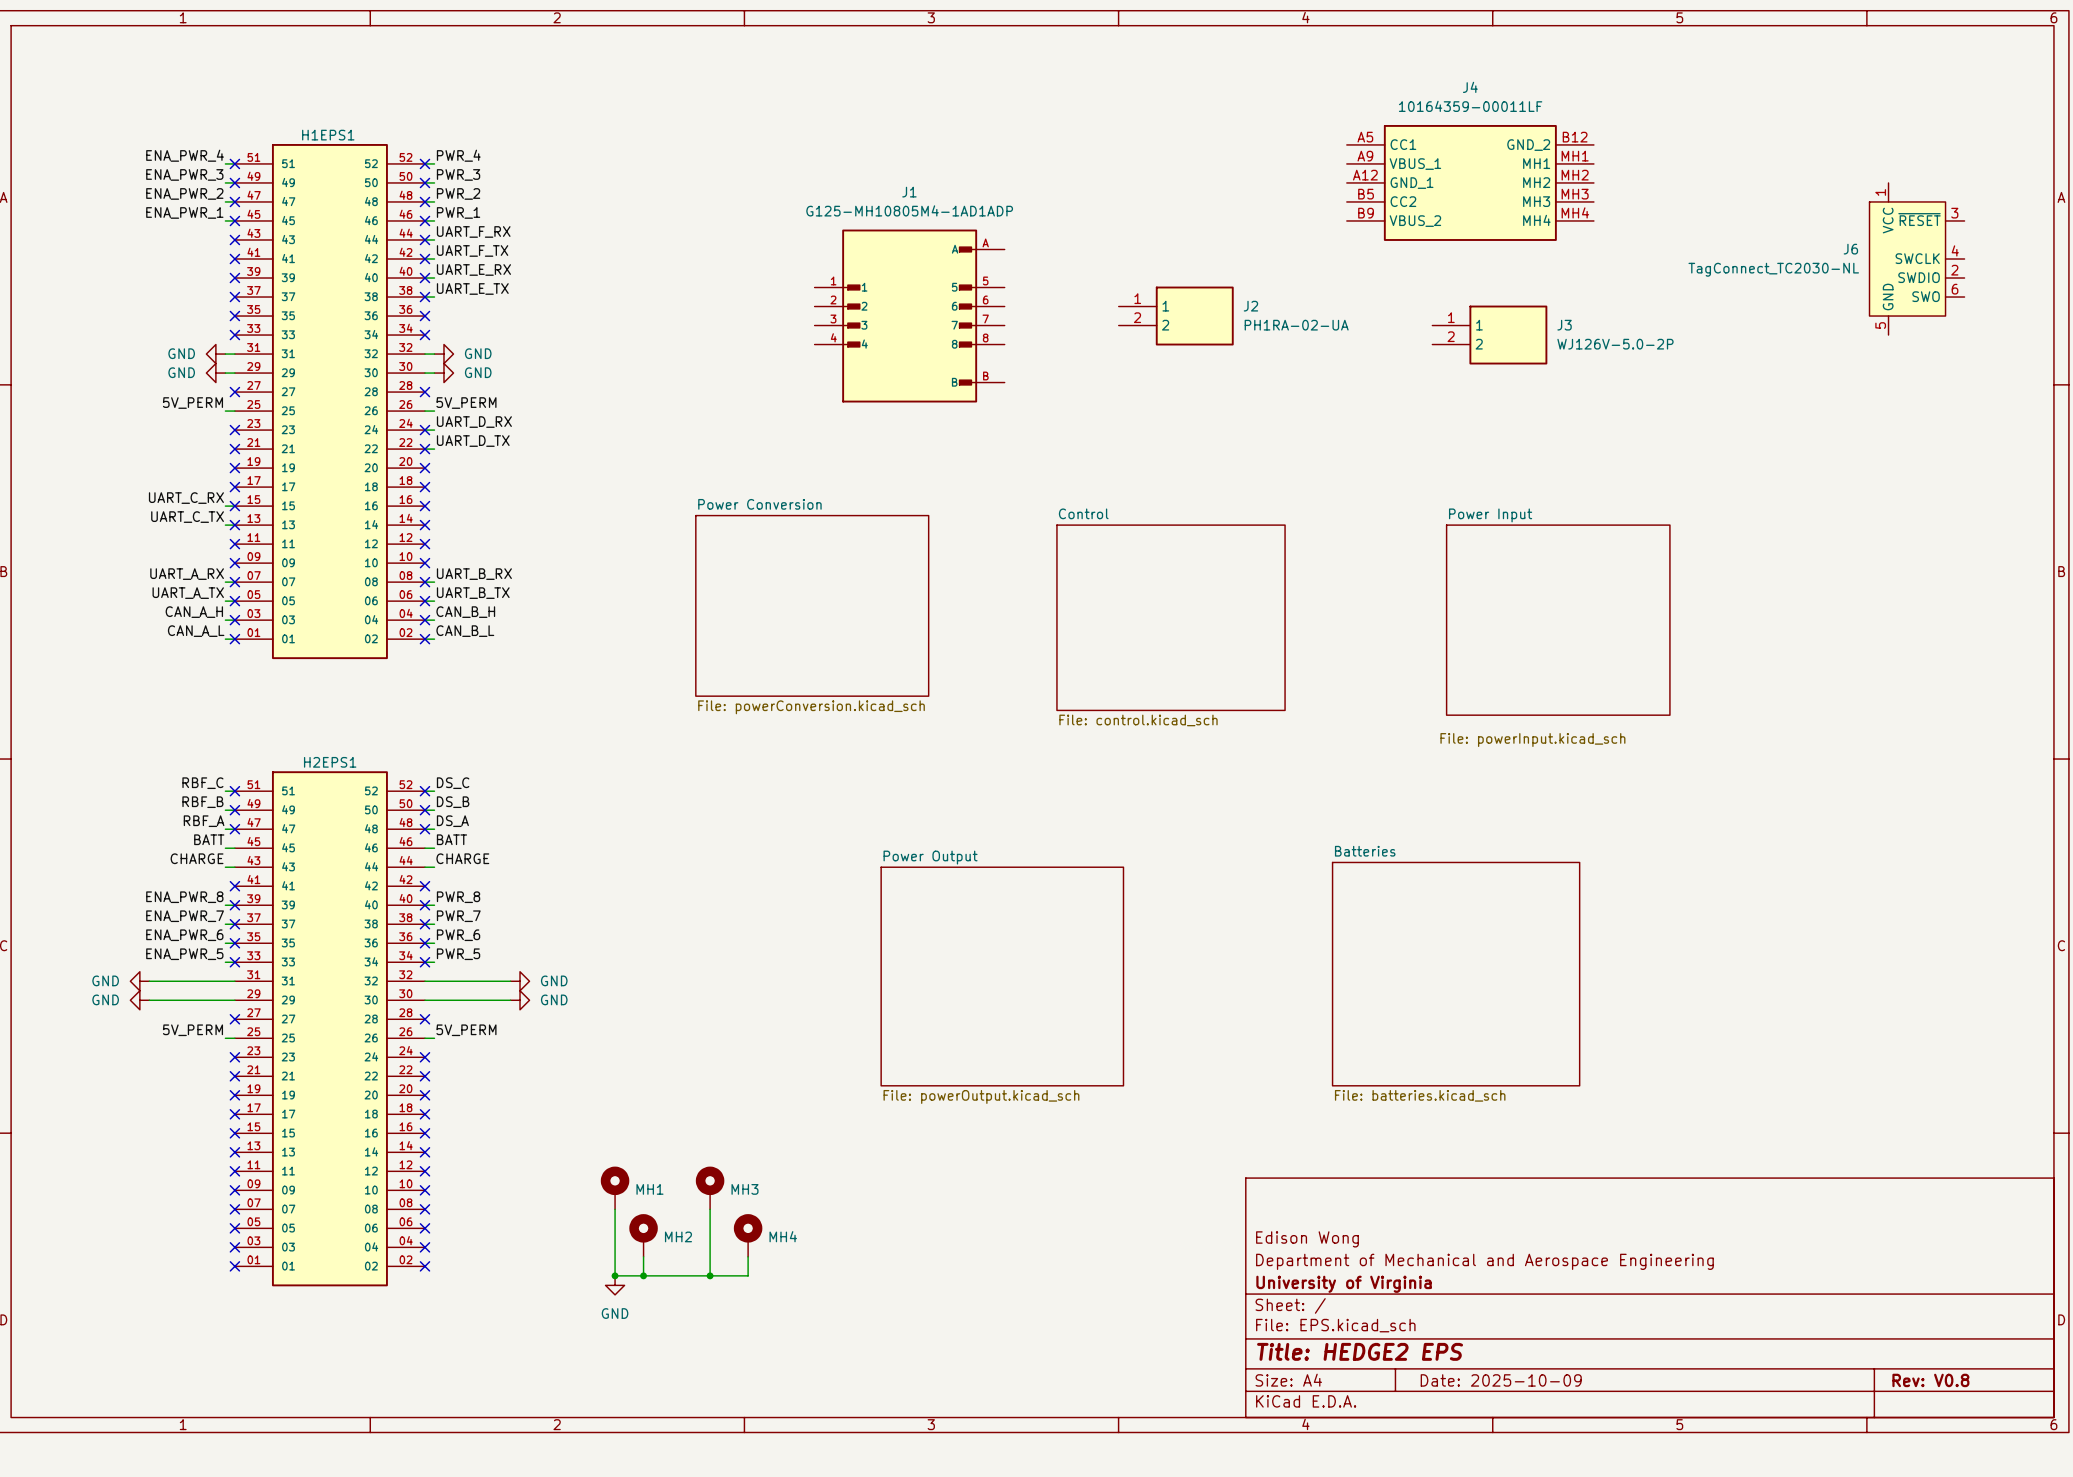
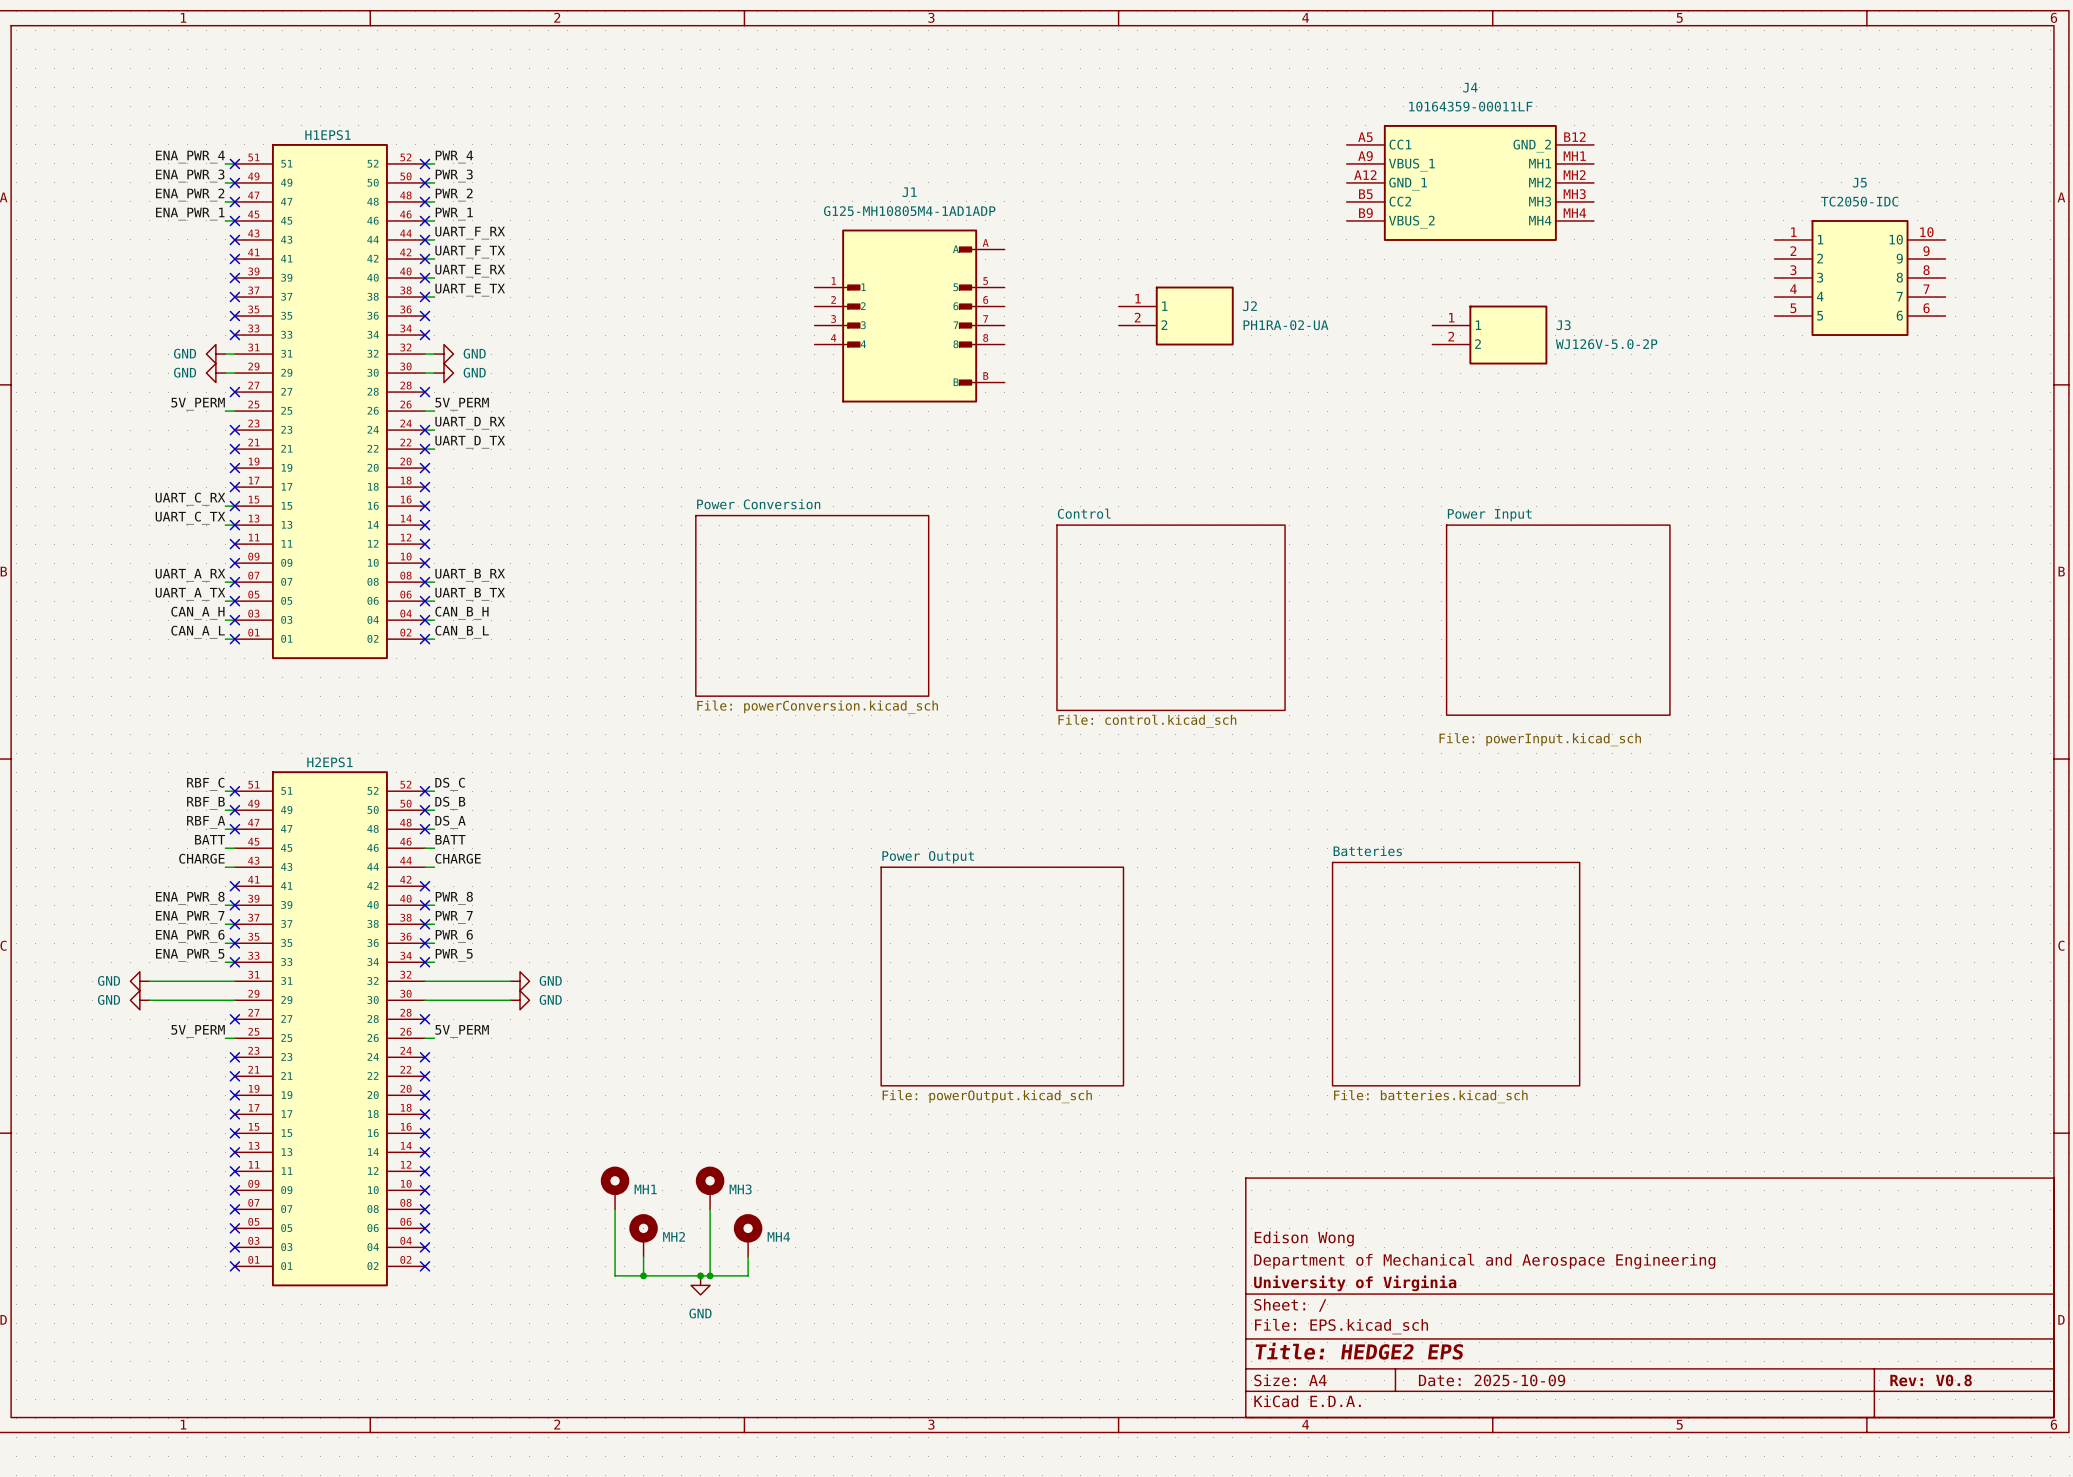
J6: TagConnect_TC2030-NL (1917, 259) -> none
J5: none -> TC2050-IDC (1860, 278)
junction: (615, 1275) -> none
junction: none -> (700, 1275)
power symbol position: GND (615, 1285) -> GND (700, 1285)

